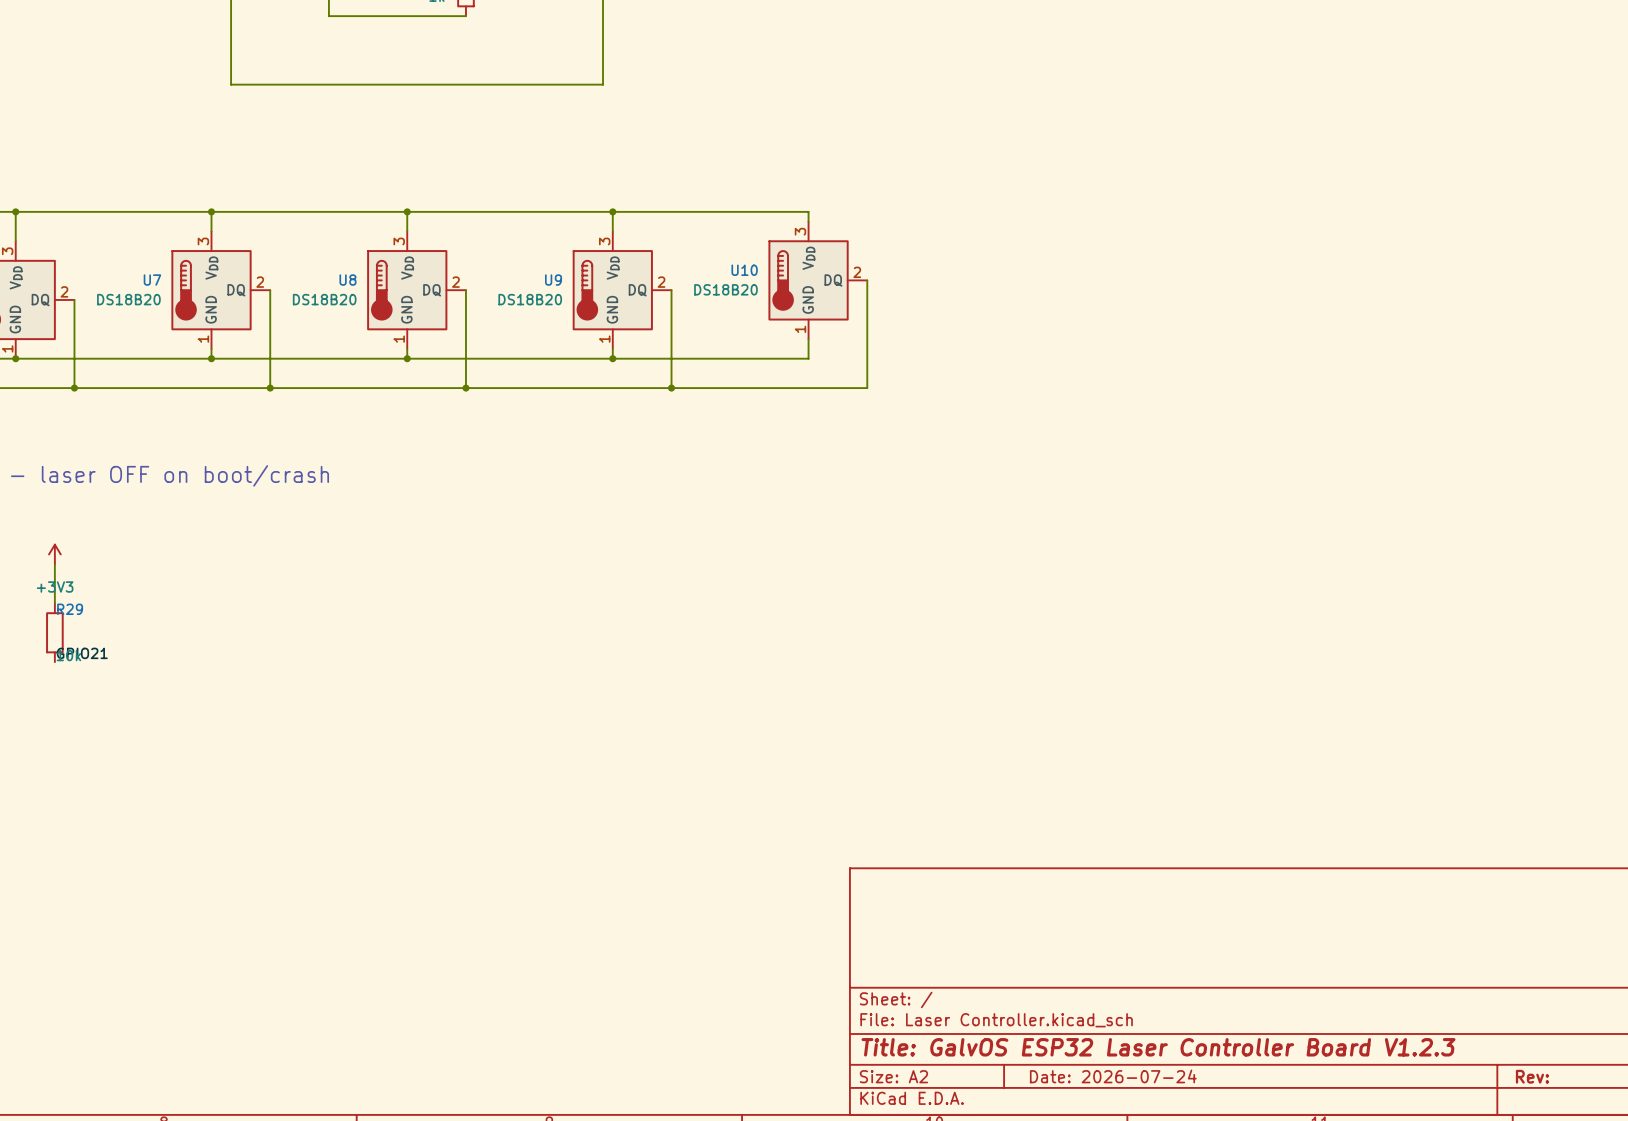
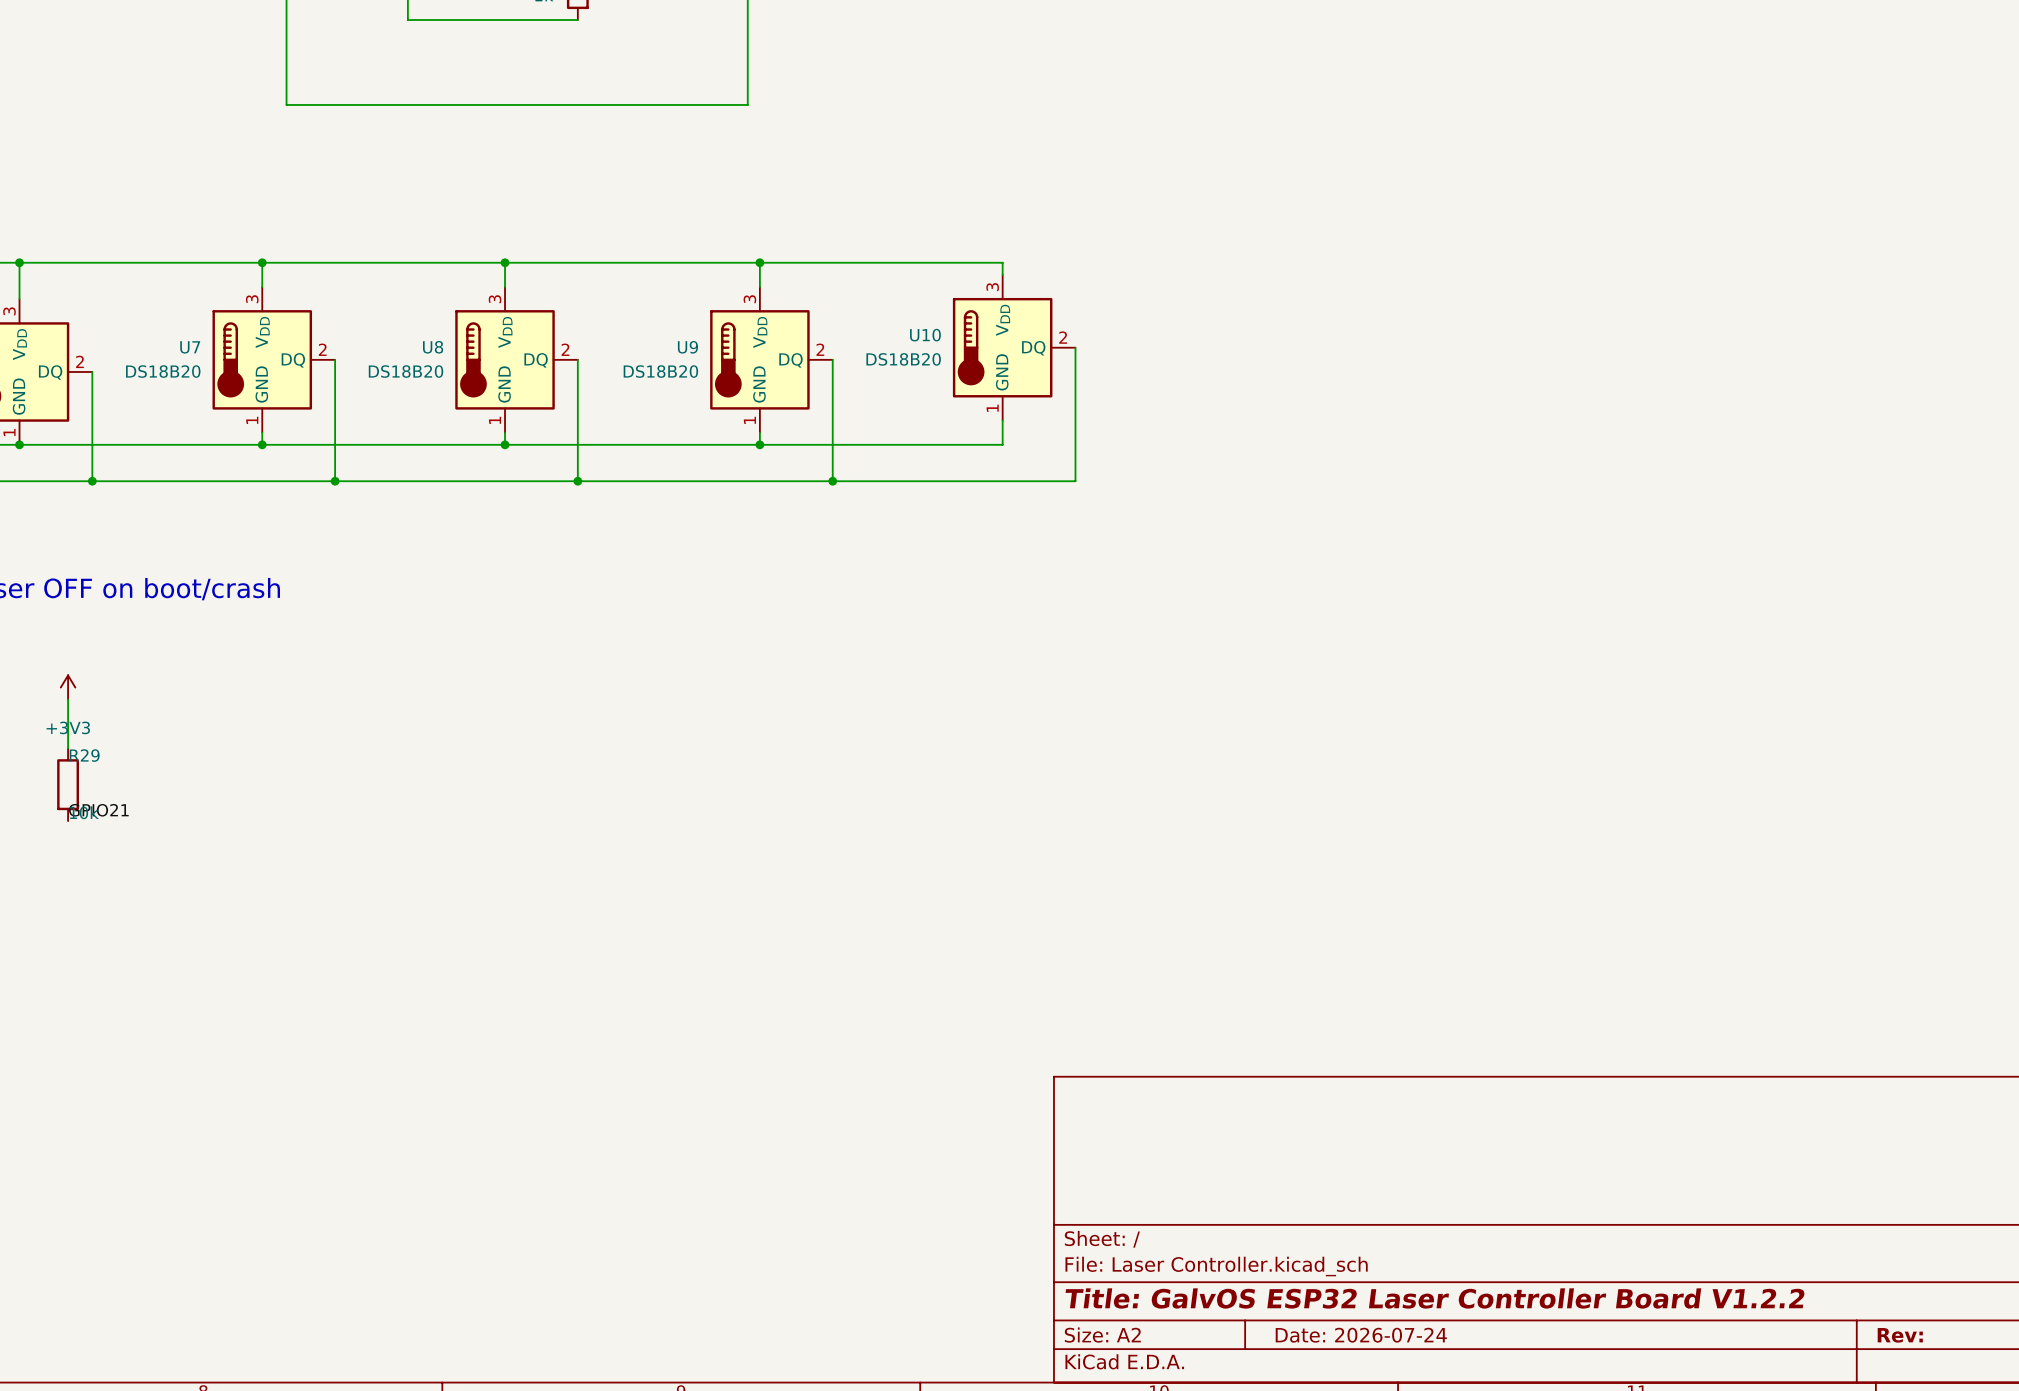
title block: Title: GalvOS ESP32 Laser Controller Board V1.2.3 (1158, 1047) -> Title: GalvOS ESP32 Laser Controller Board V1.2.2 (1435, 1298)

